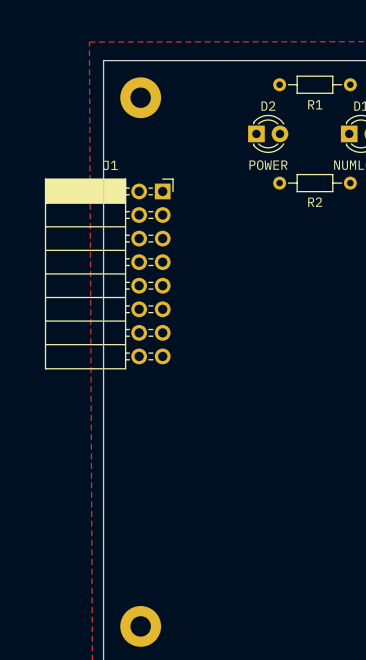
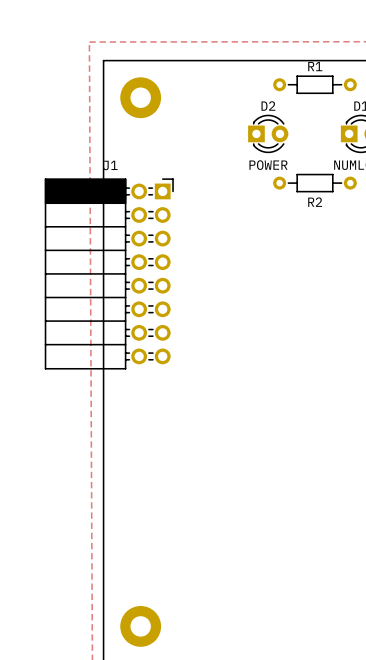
R1 name position: R1 (315, 104) -> R1 (315, 66)

